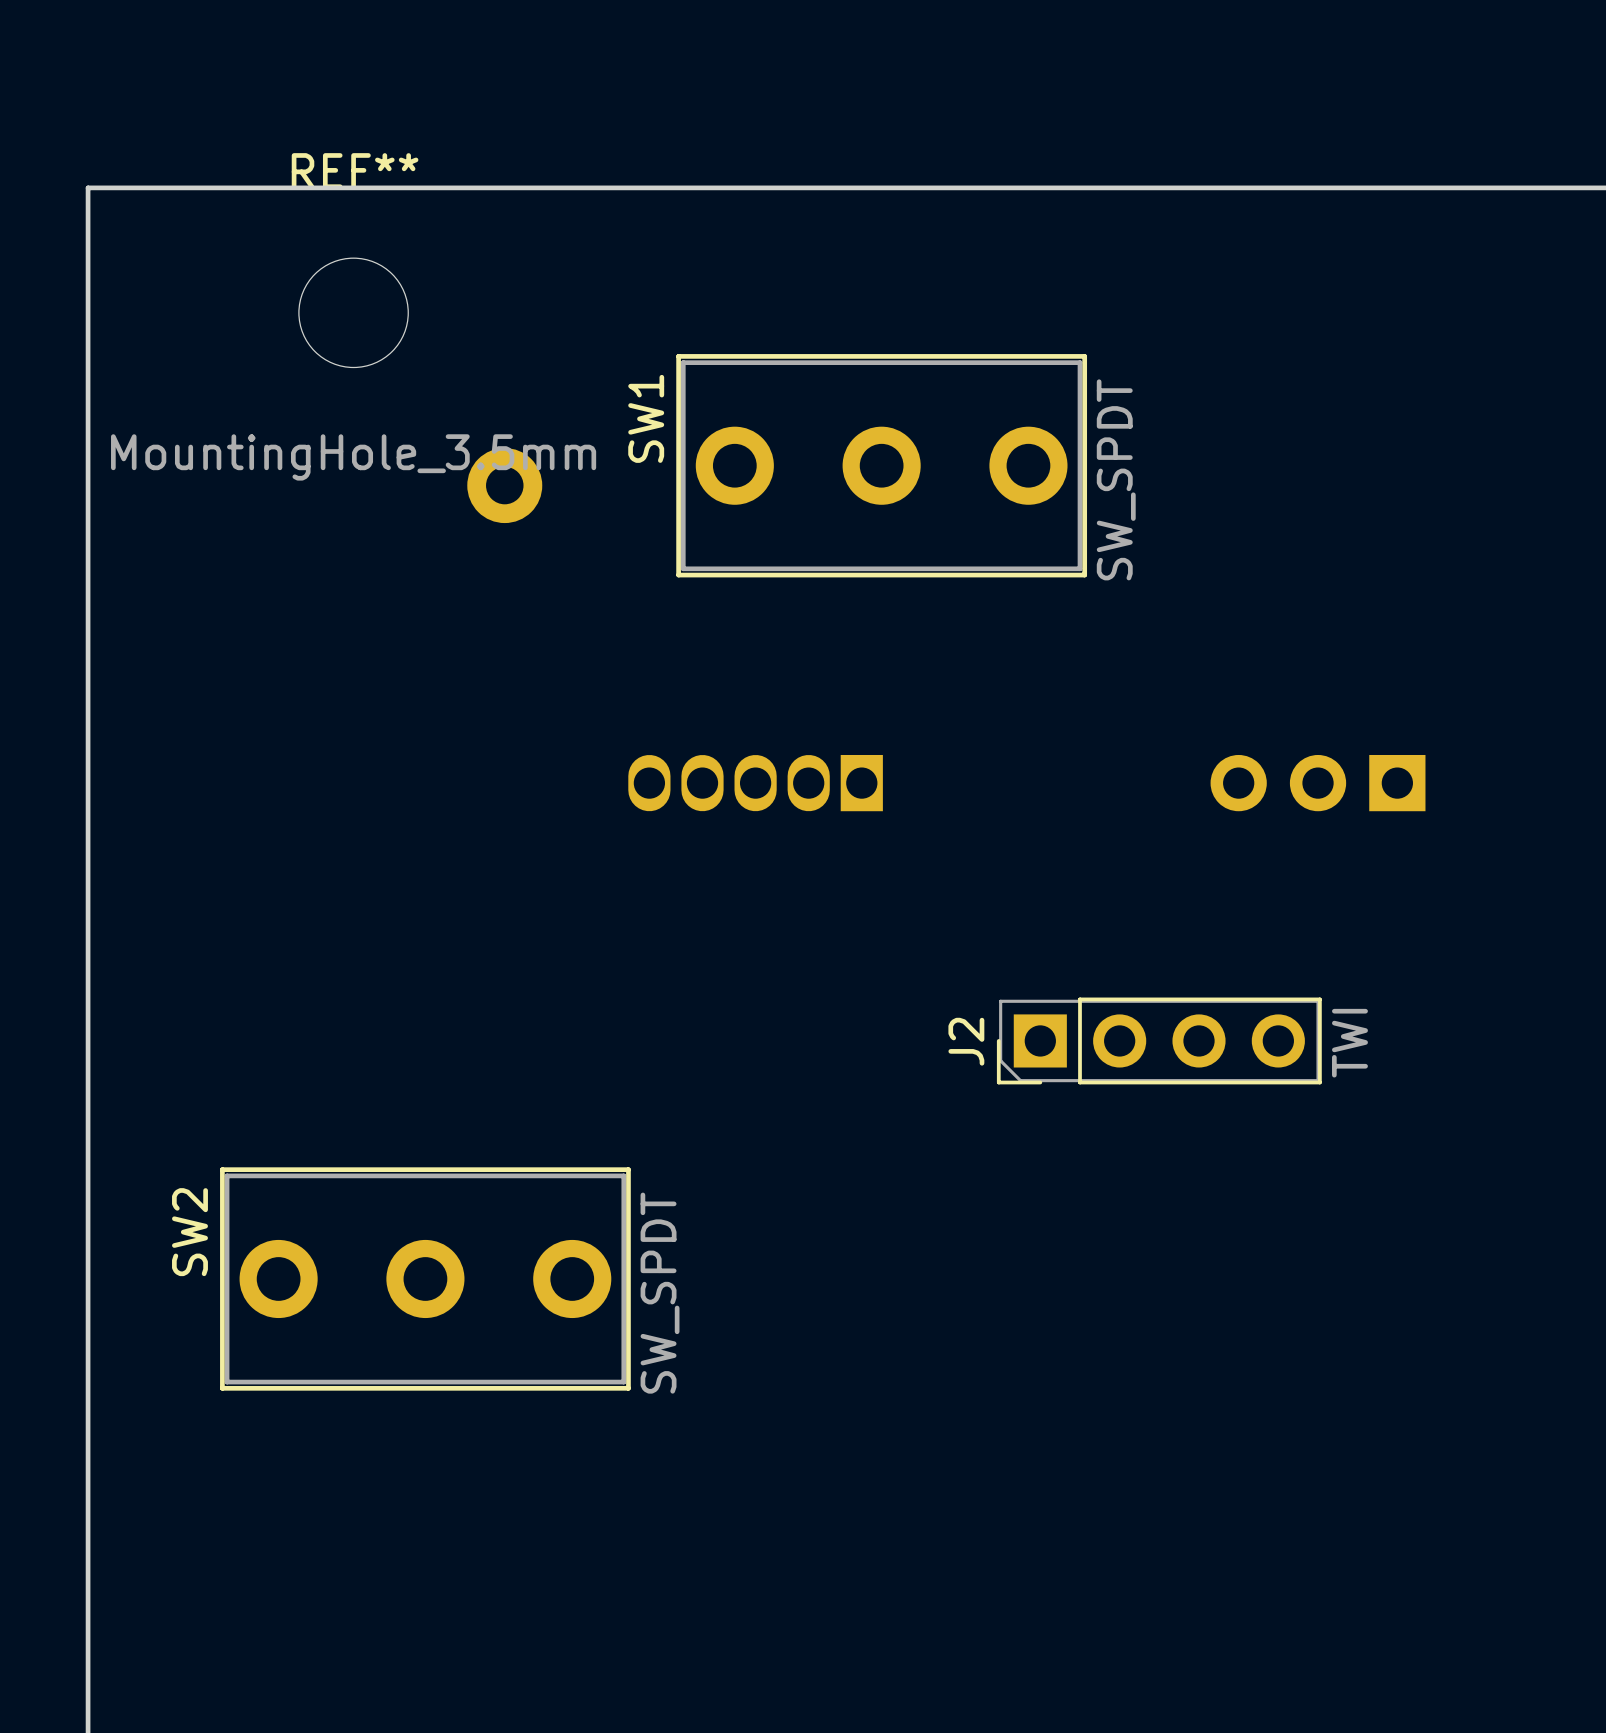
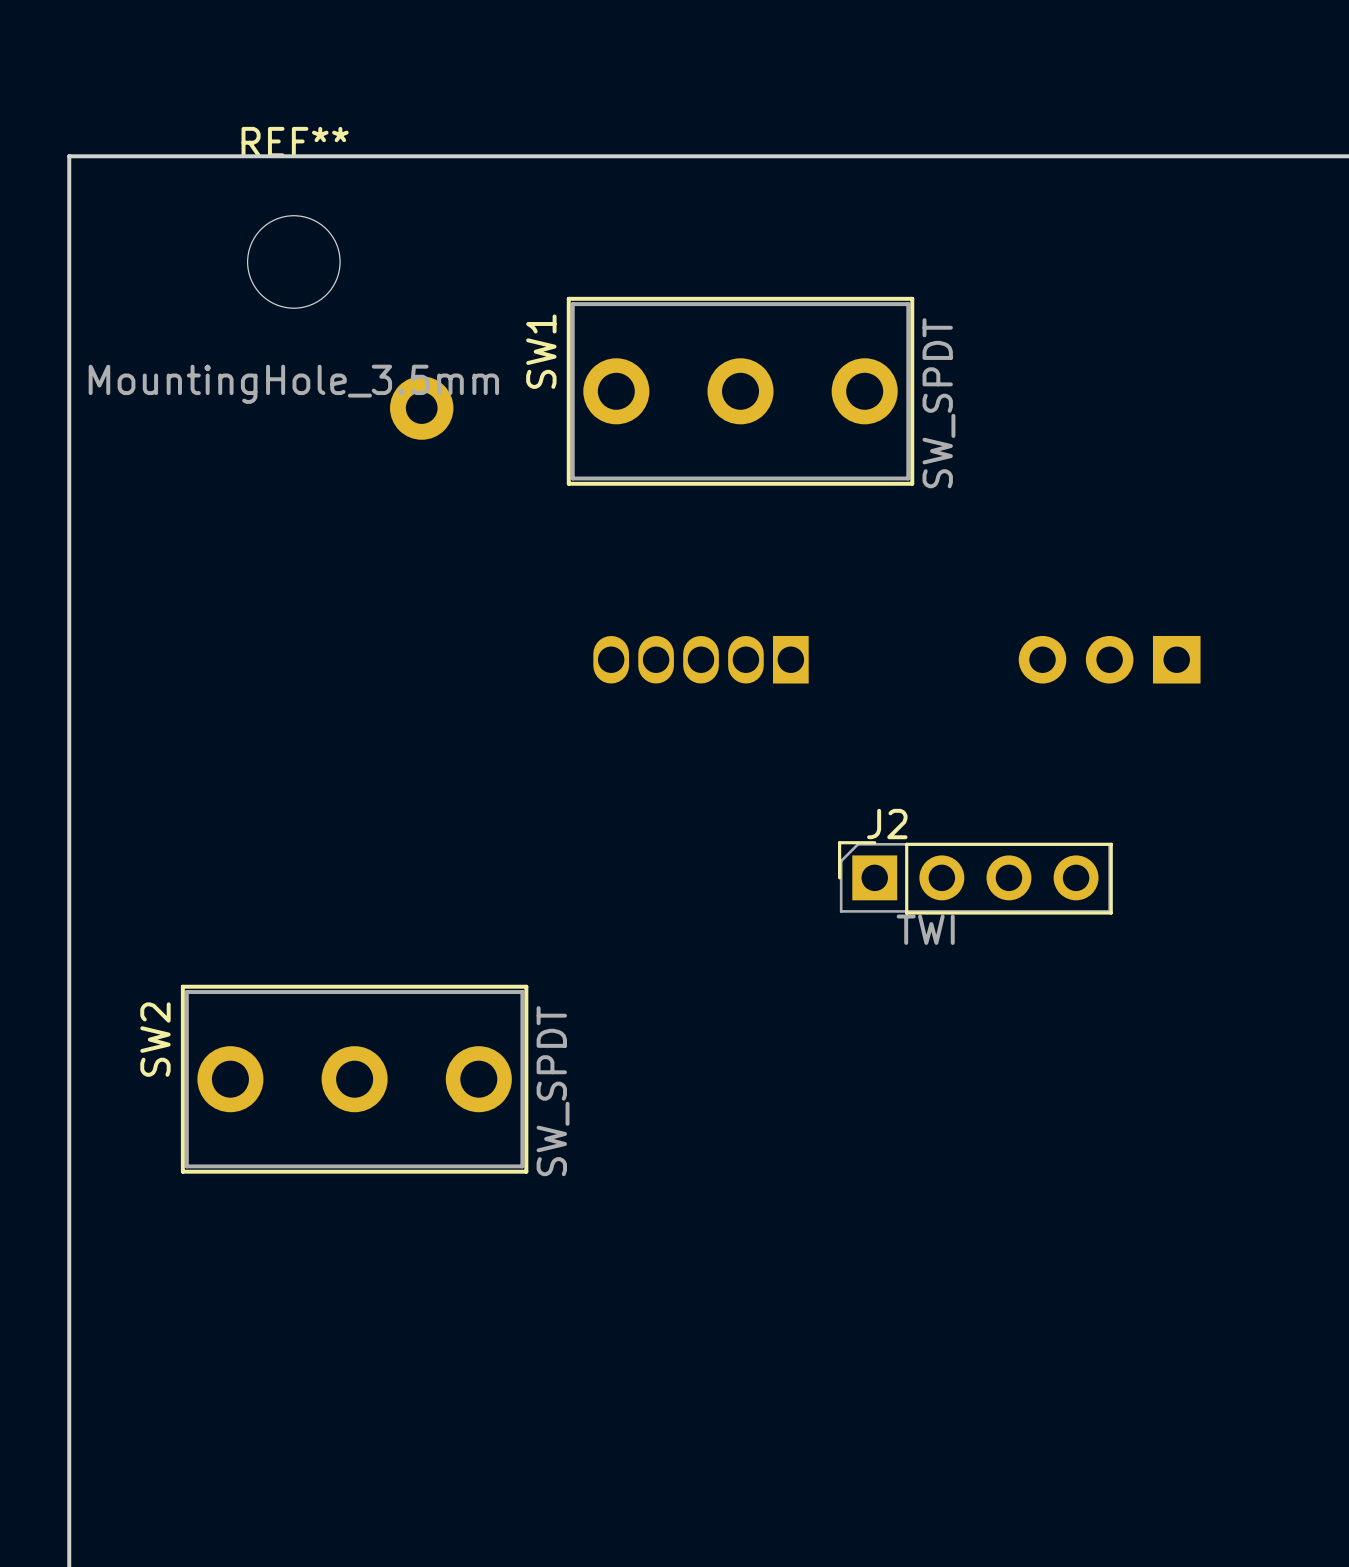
part position: (755, 783) -> (701, 659)
J2 footprint: [996, 997, 1322, 1085] -> [838, 841, 1113, 915]
J2 name position: J2 (966, 1041) -> J2 (887, 824)
J2 value position: TWI (1349, 1043) -> TWI (925, 929)

